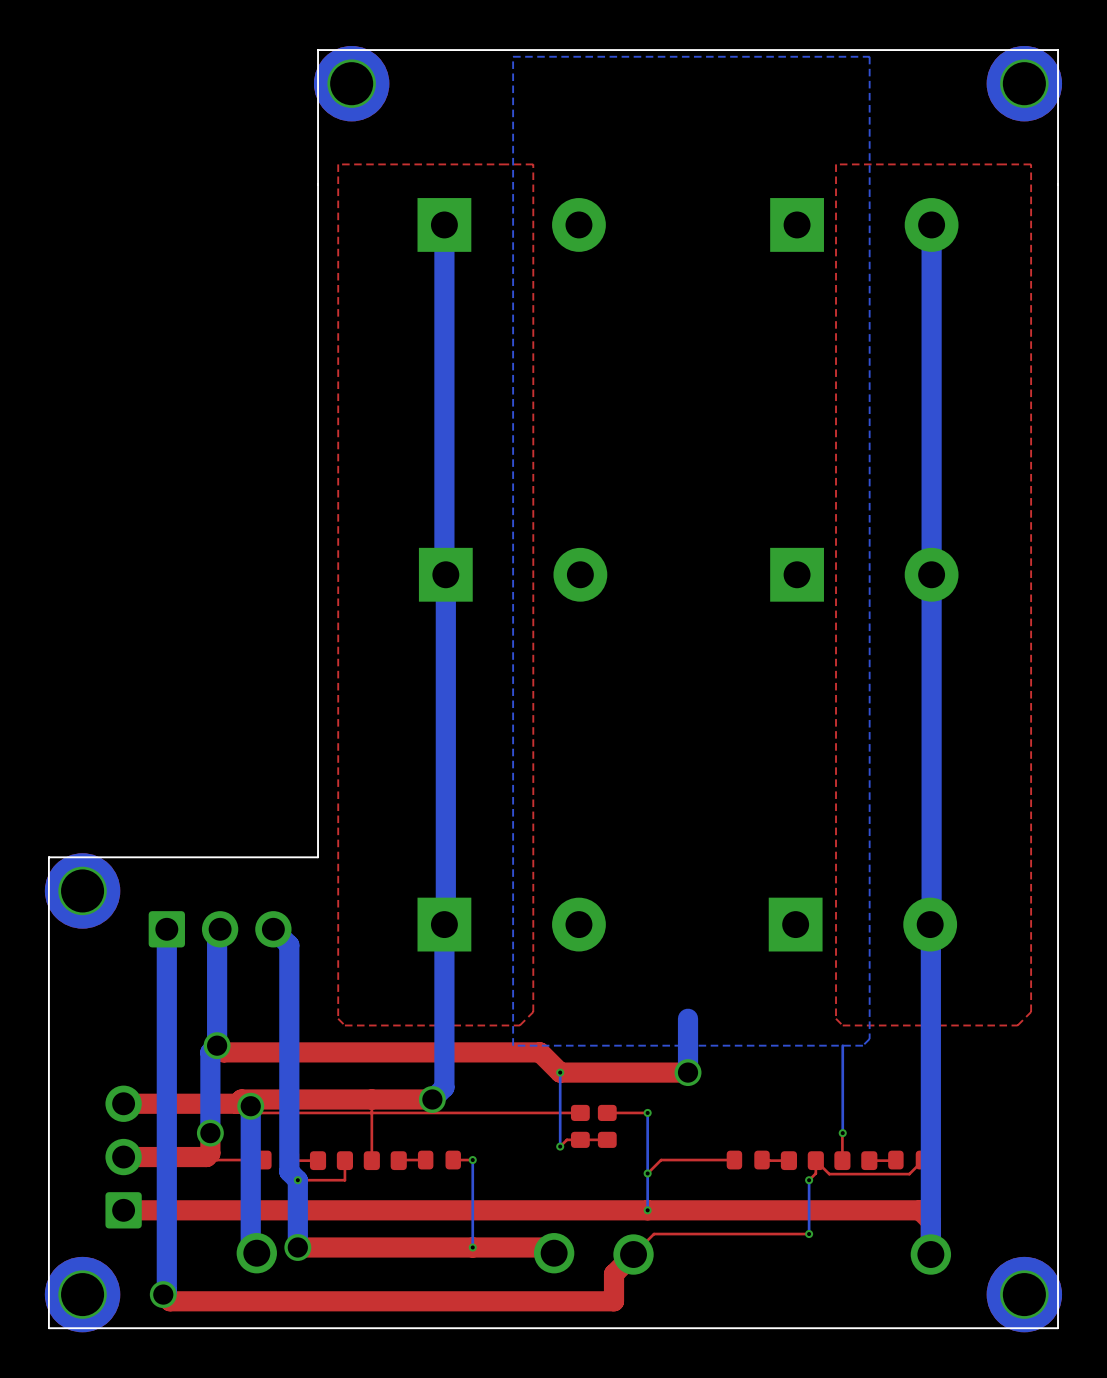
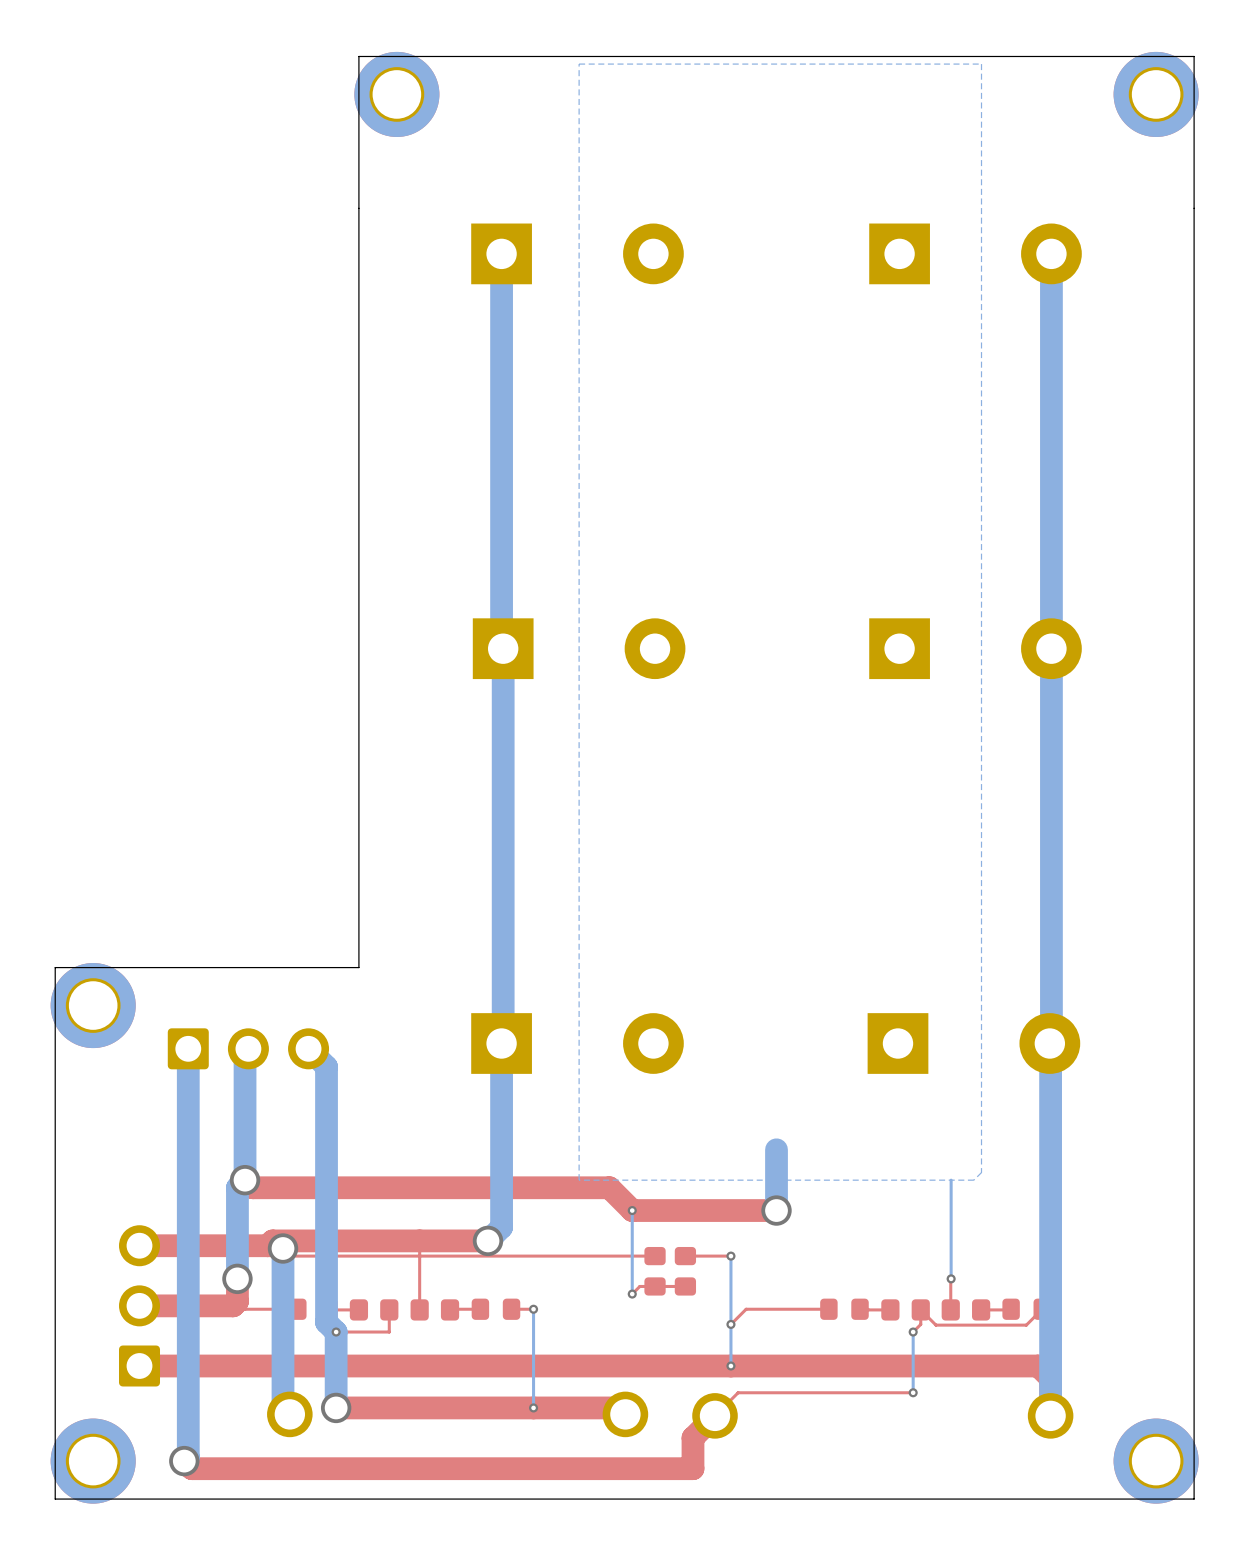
top zone outline: (533, 164) (338, 164) (338, 1018) (344, 1025) (519, 1025) (533, 1012) (533, 164) -> none
top zone outline: (1031, 164) (836, 164) (836, 1018) (842, 1025) (1017, 1025) (1031, 1012) (1031, 164) -> none

